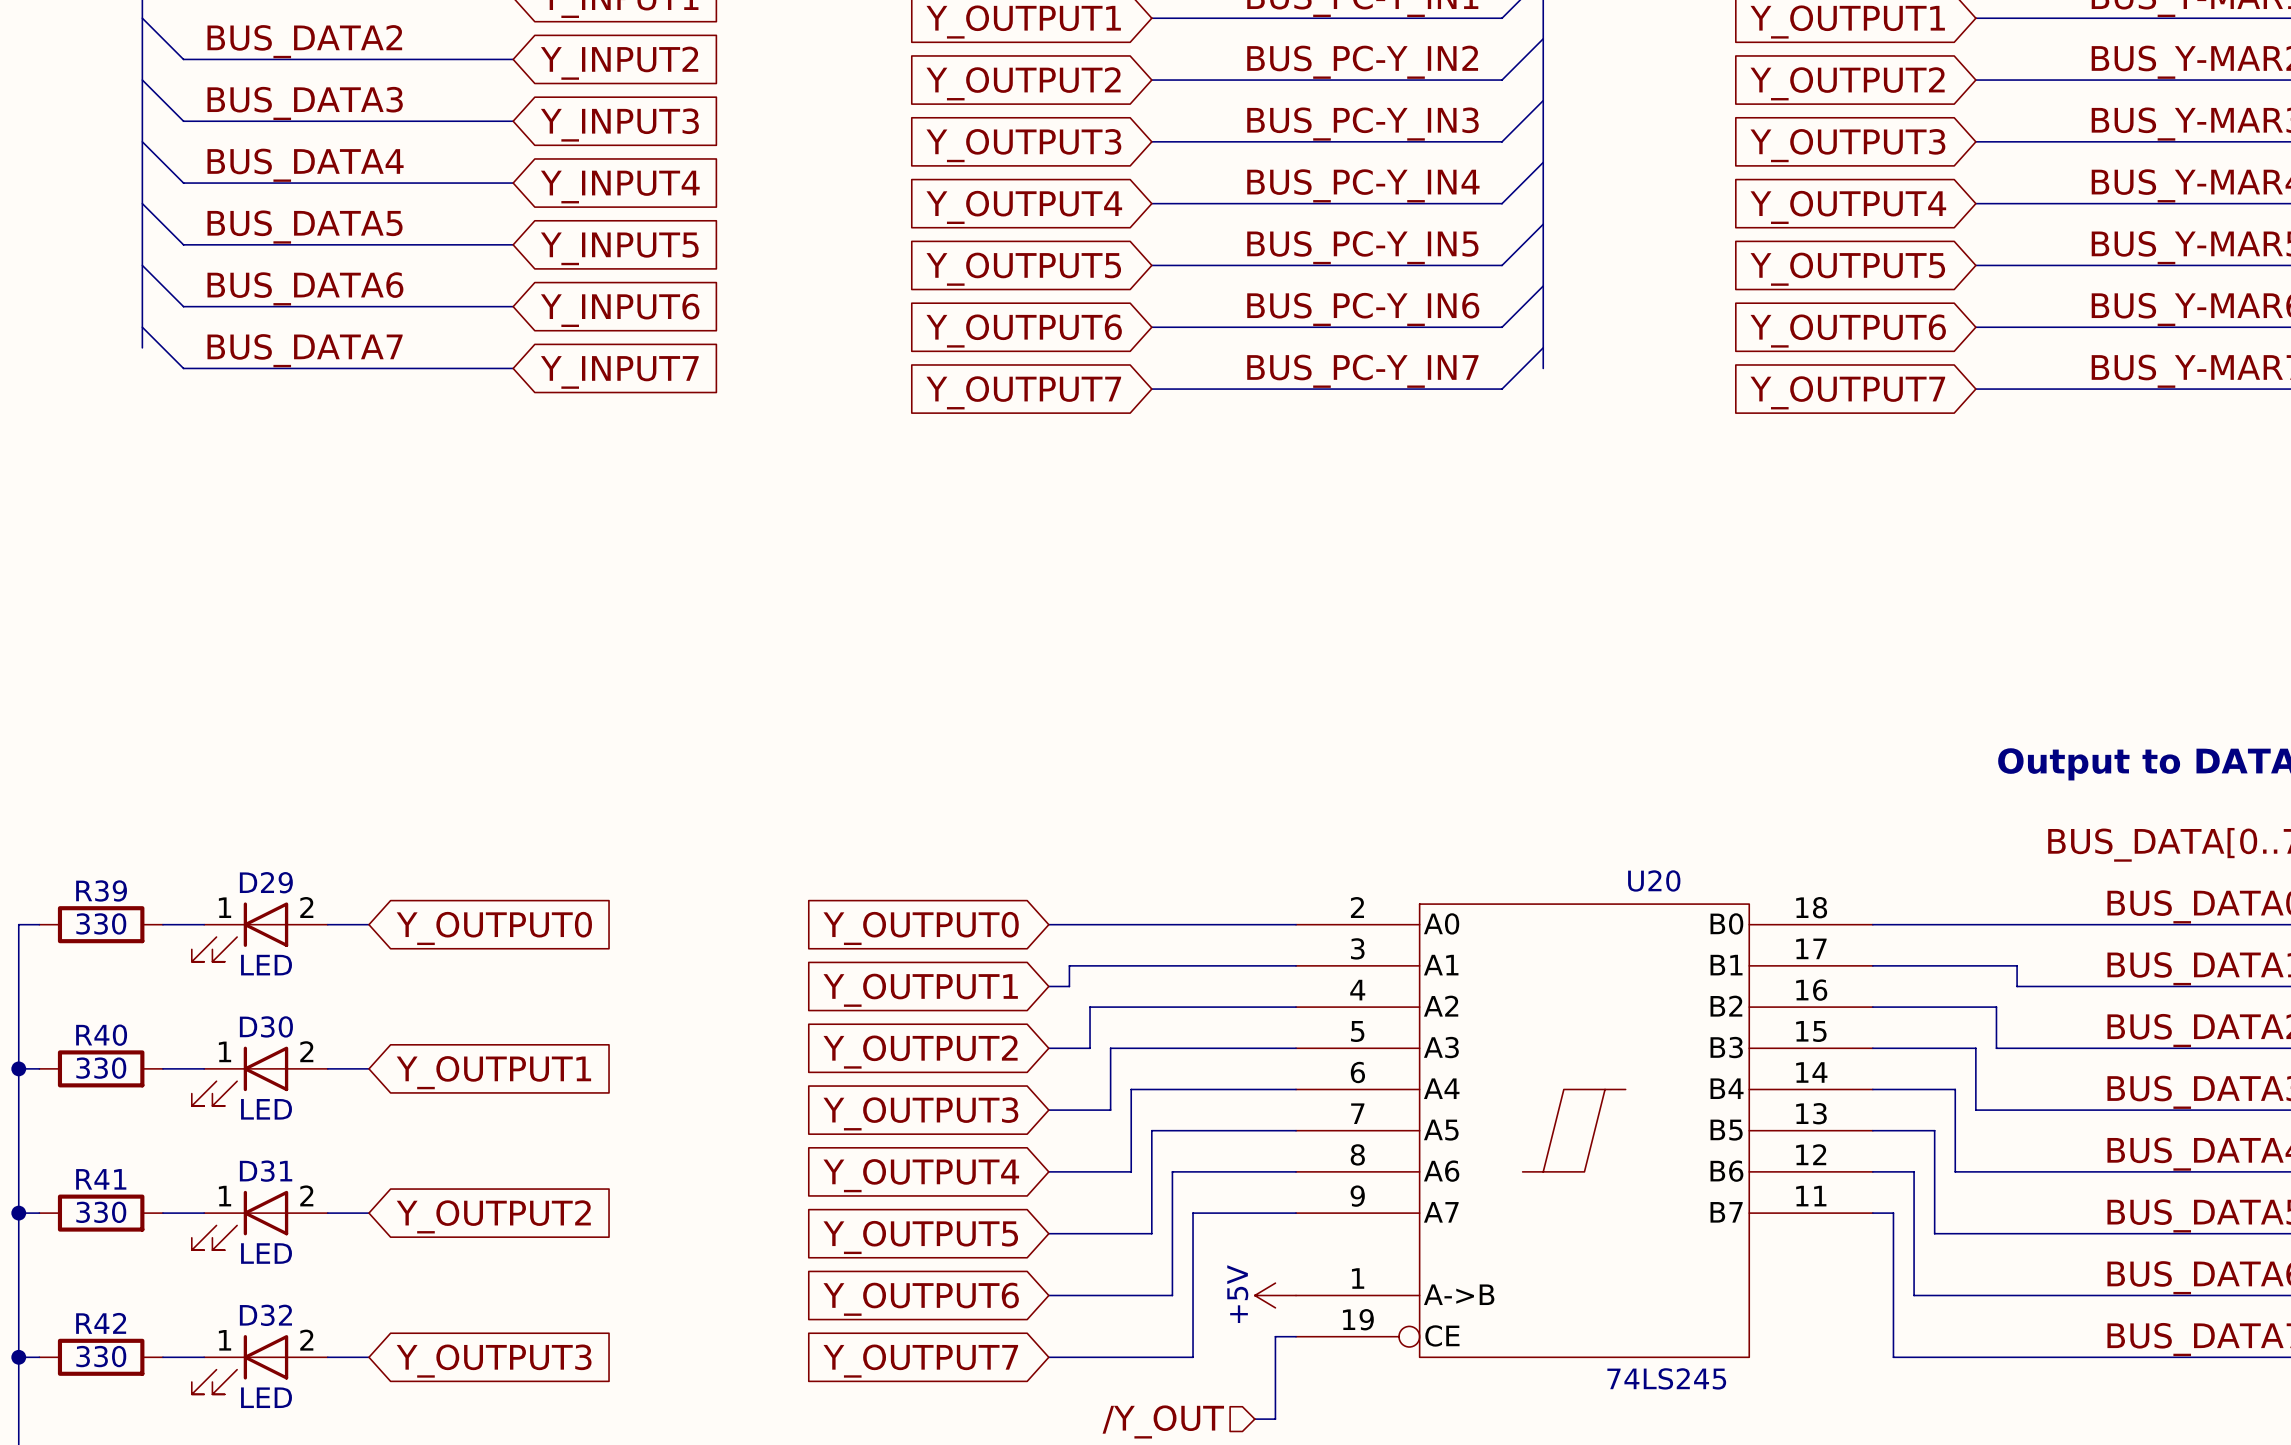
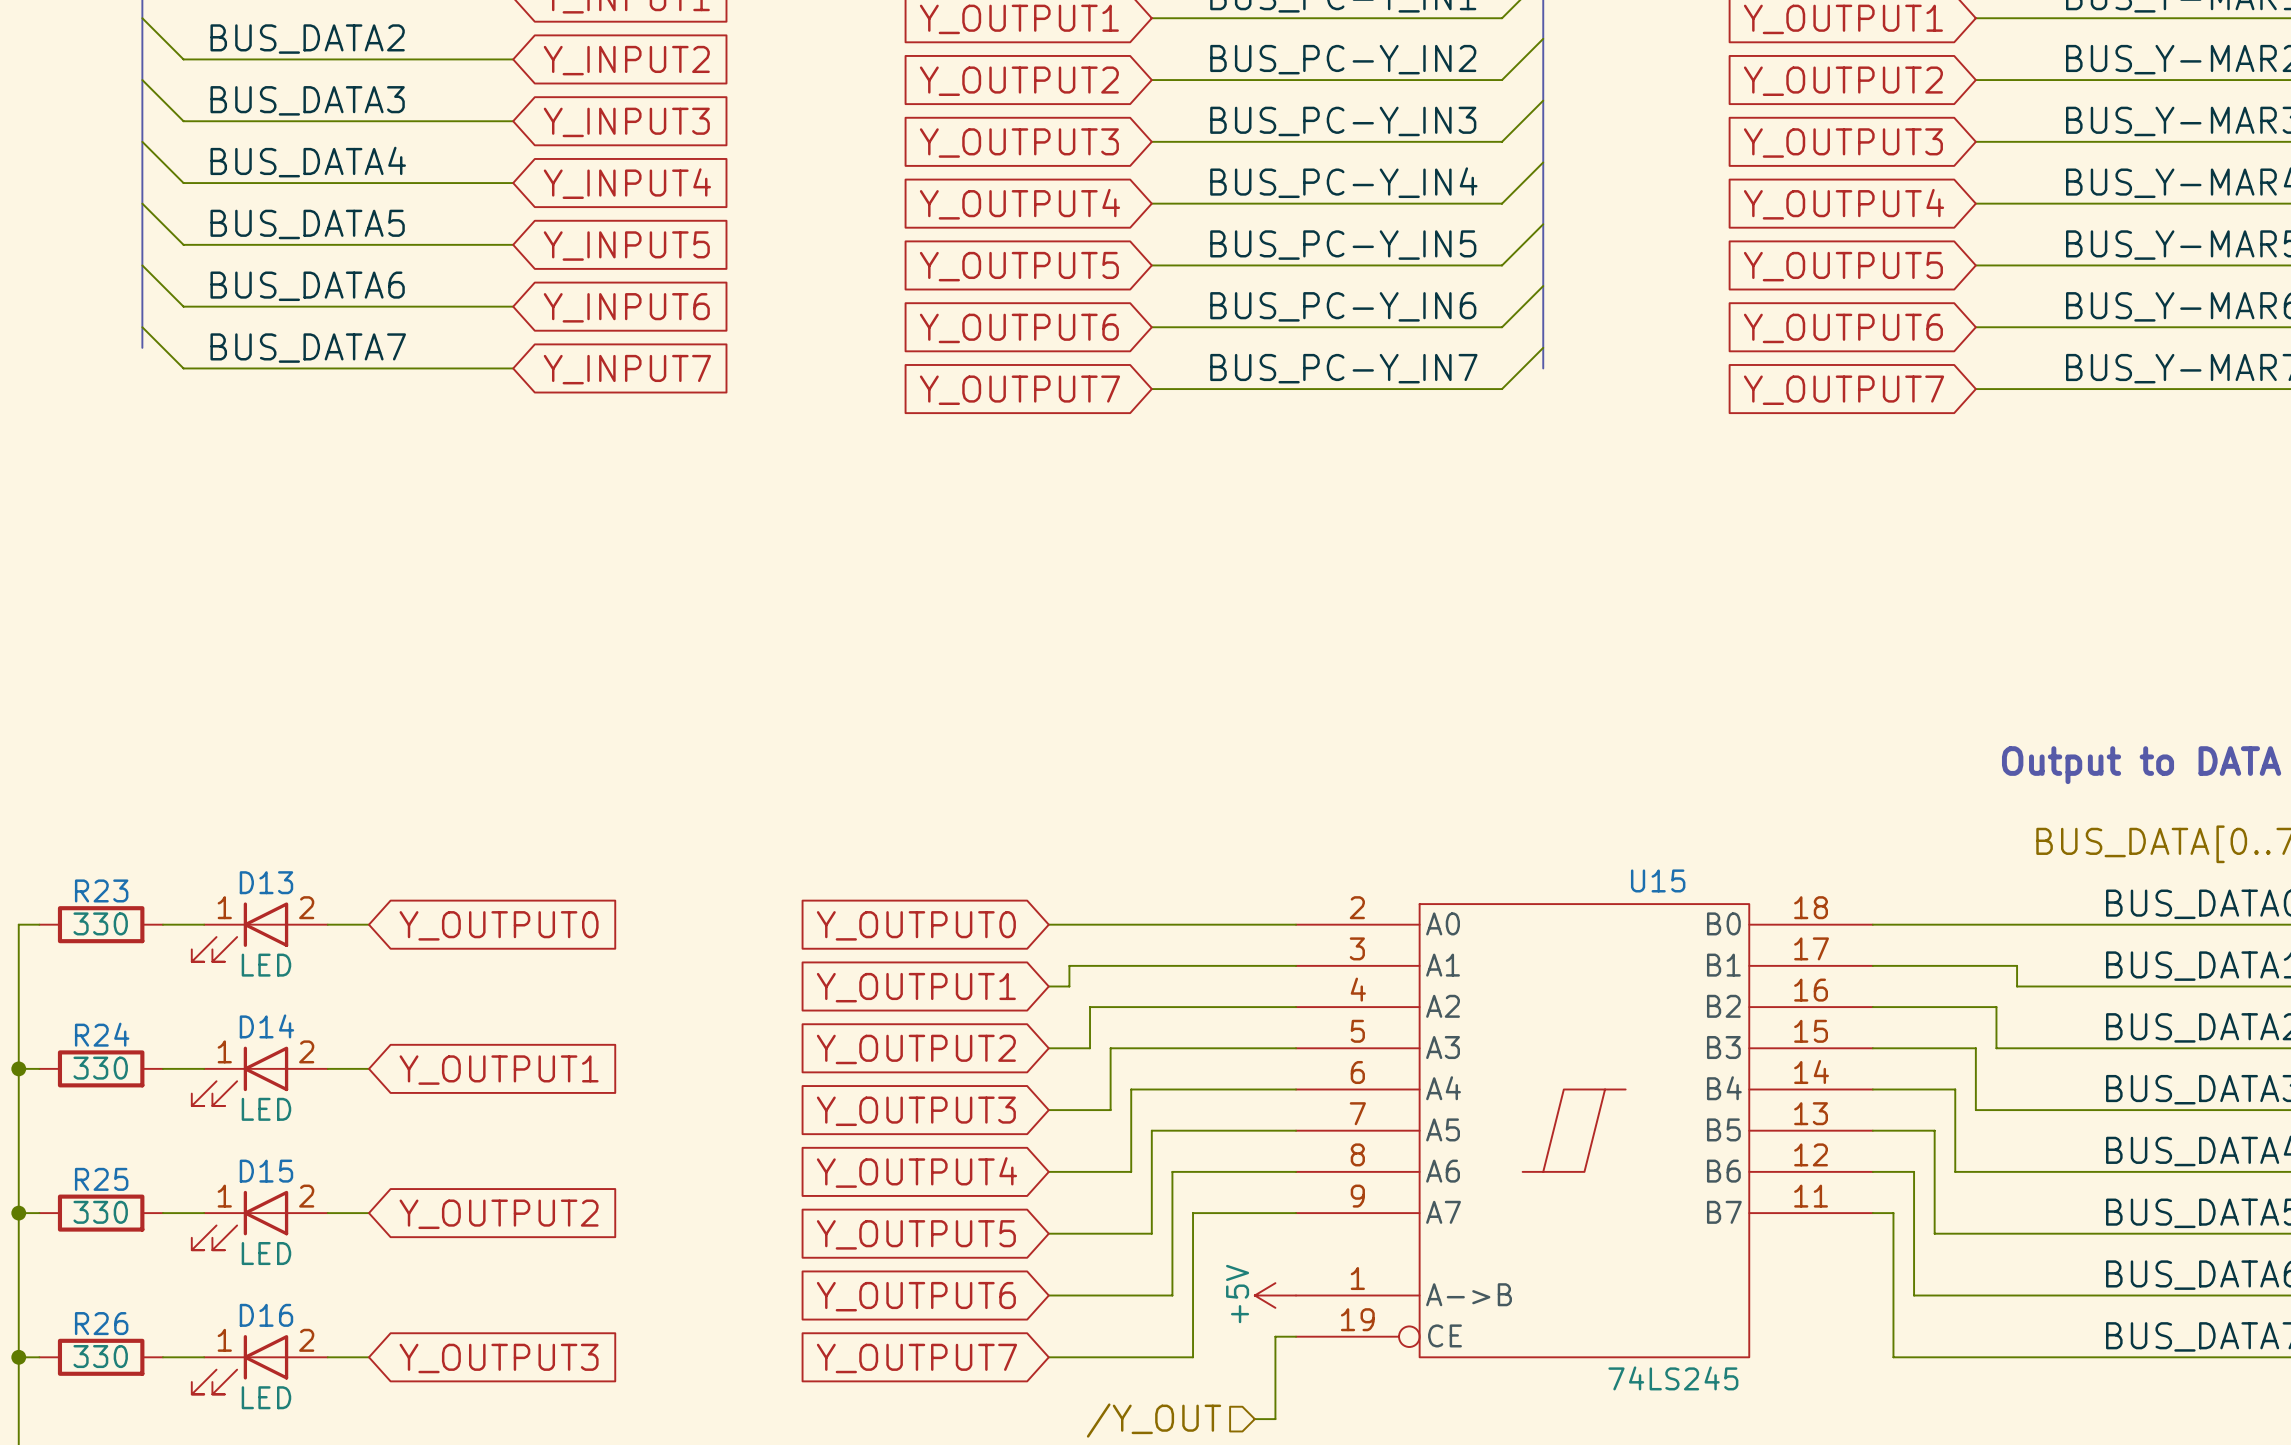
U20 name: U20 (1654, 880) -> U15 (1658, 880)
D29 name: D29 (266, 882) -> D13 (266, 882)
R39 name: R39 (101, 890) -> R23 (101, 890)
D30 name: D30 (266, 1026) -> D14 (266, 1026)
R40 name: R40 (101, 1035) -> R24 (102, 1034)
D31 name: D31 (266, 1171) -> D15 (266, 1171)
R41 name: R41 (101, 1179) -> R25 (101, 1179)
D32 name: D32 (265, 1315) -> D16 (266, 1315)
R42 name: R42 (101, 1323) -> R26 (101, 1323)

